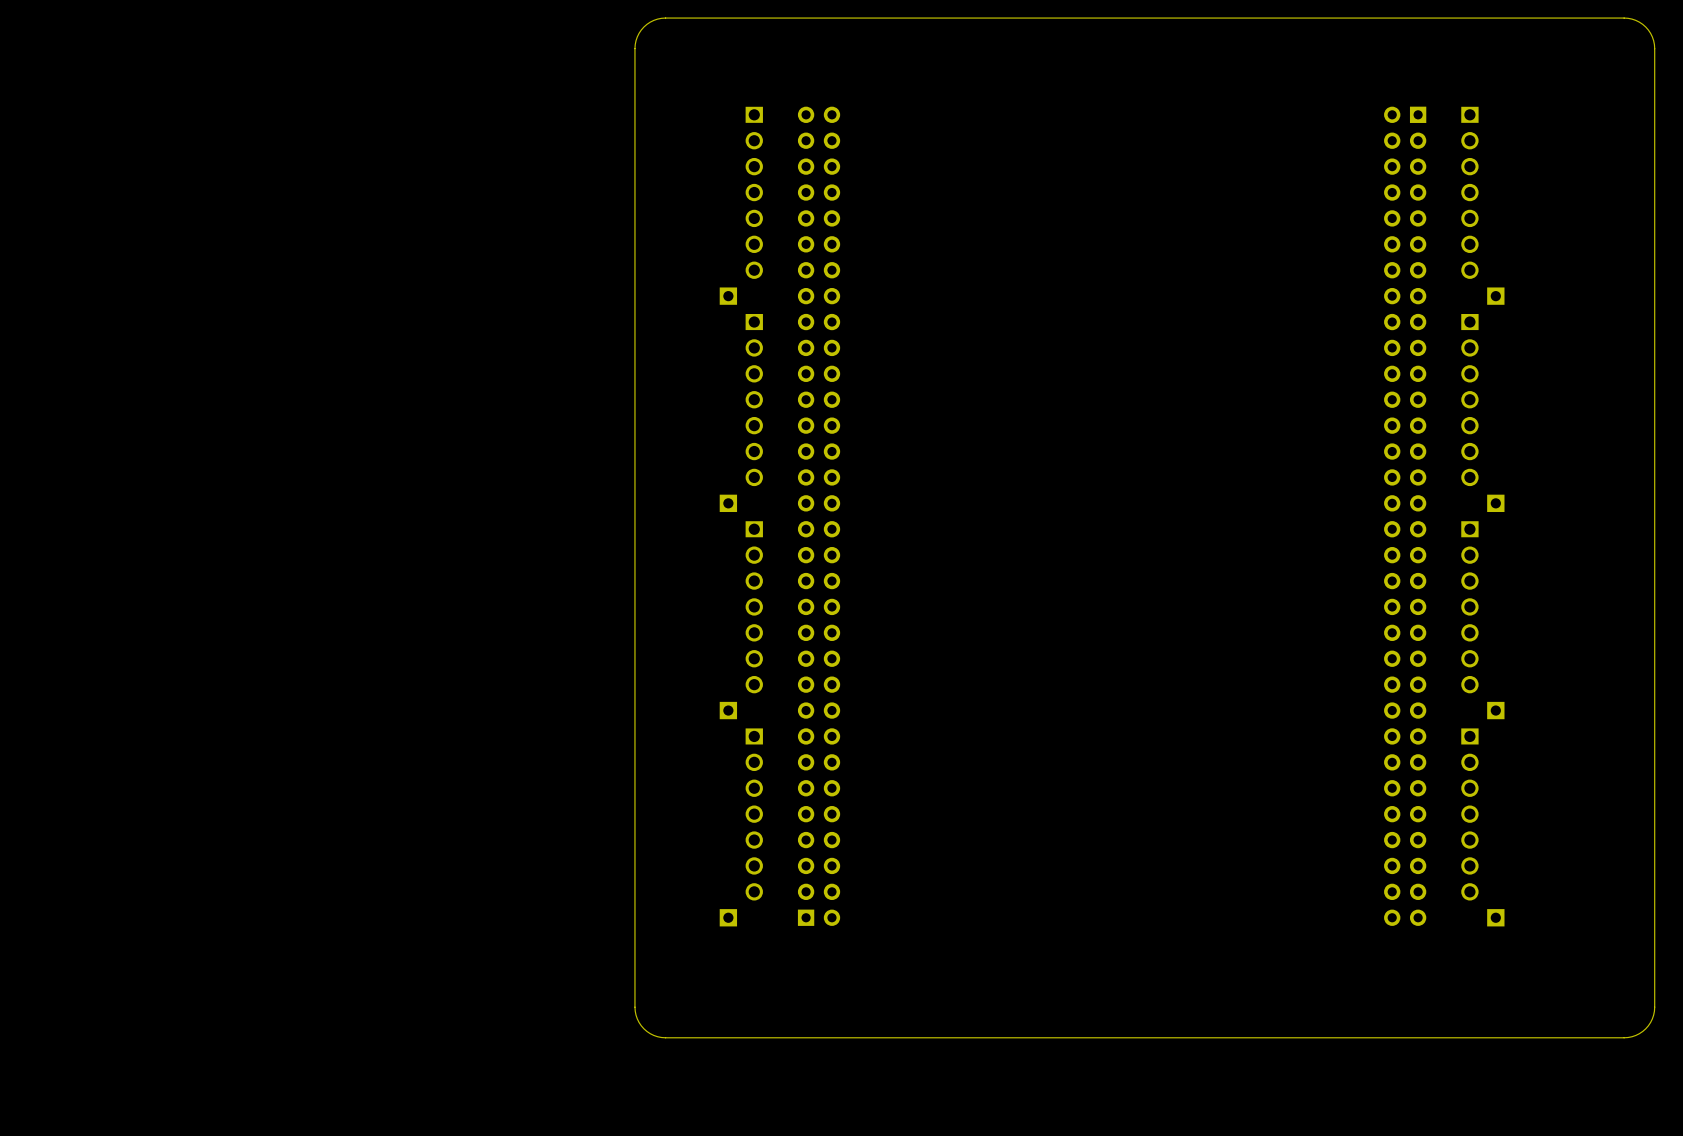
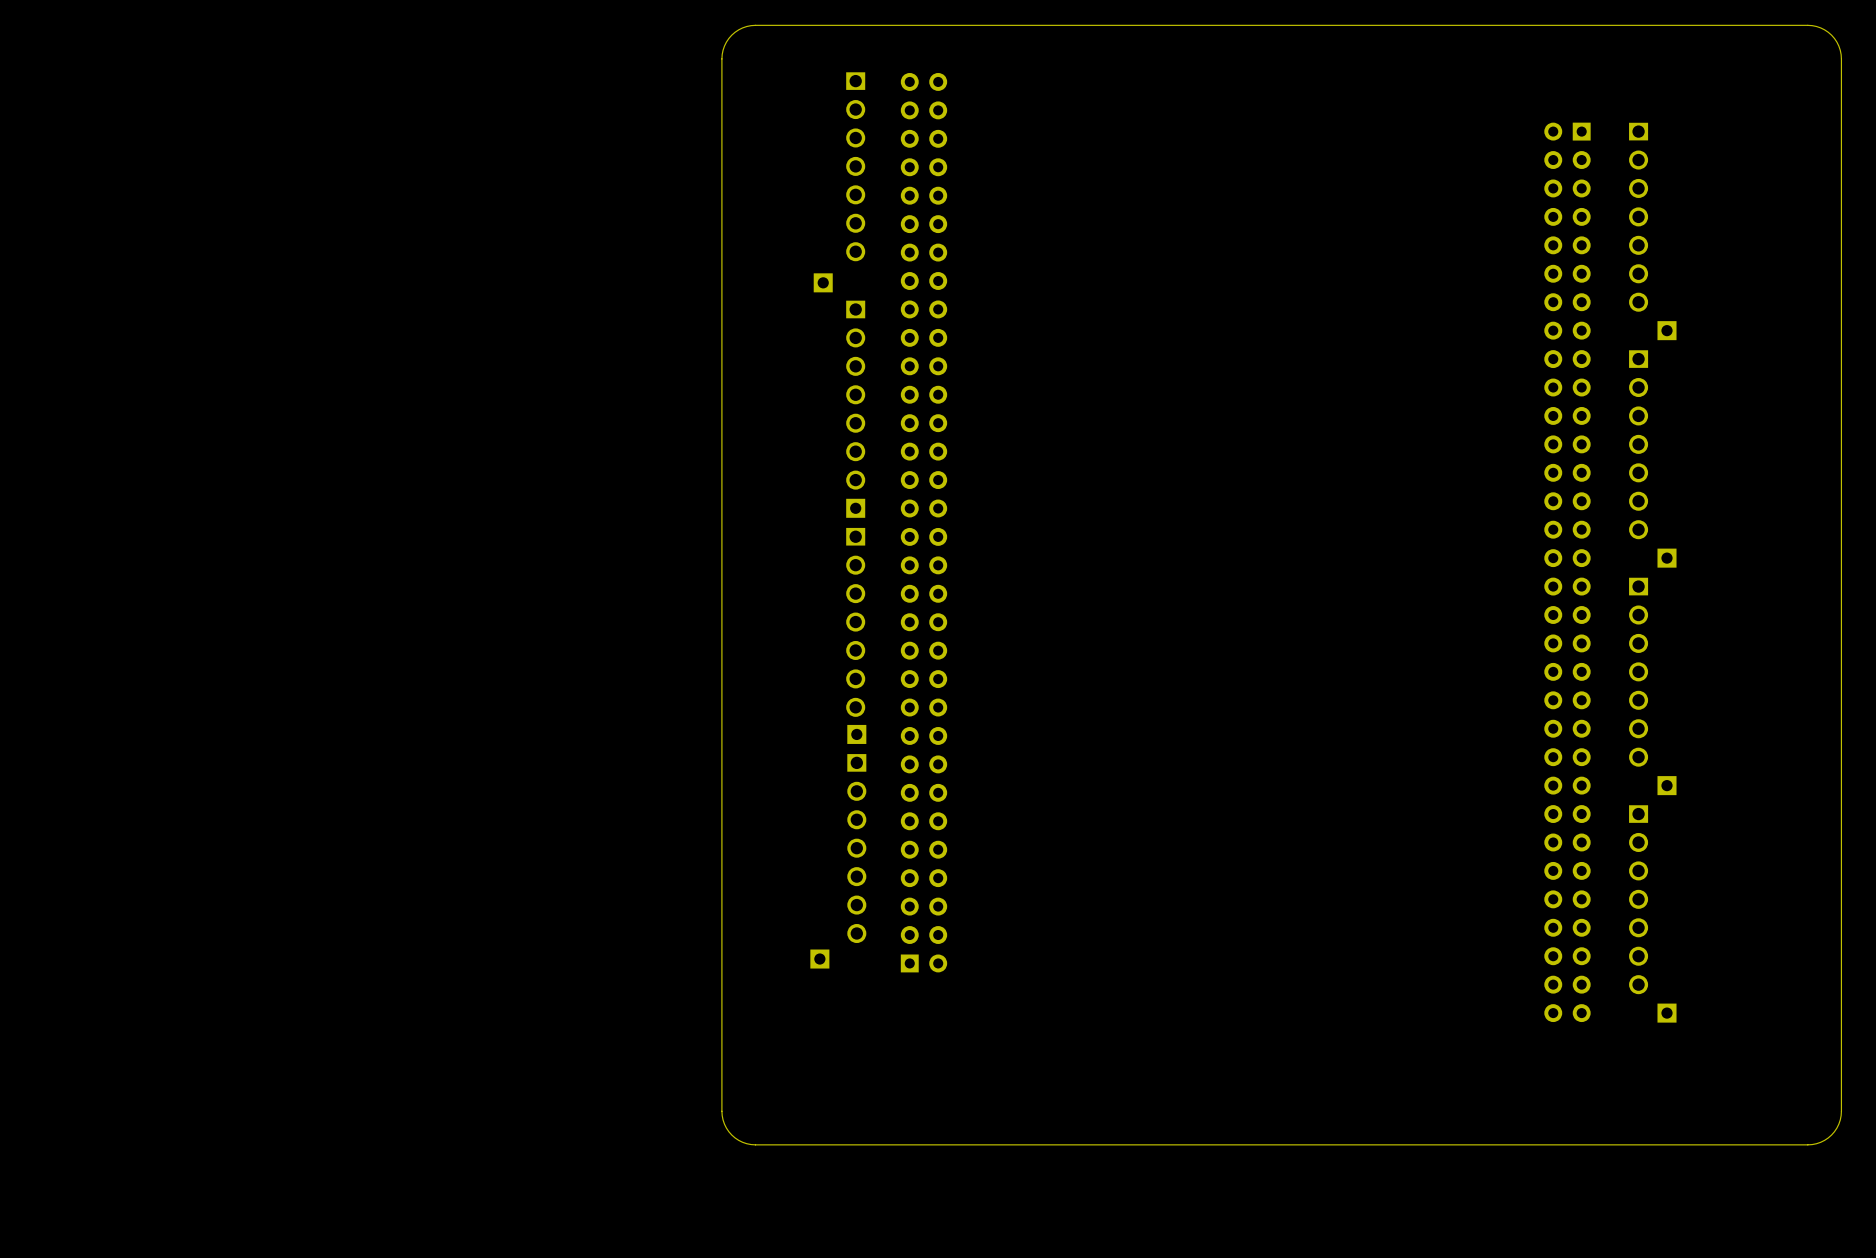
part position: (754, 192) -> (855, 166)
part position: (728, 296) -> (823, 282)
part position: (754, 400) -> (855, 395)
part position: (728, 503) -> (855, 508)
part position: (819, 516) -> (923, 522)
part position: (754, 607) -> (855, 622)
part position: (728, 710) -> (856, 734)
part position: (754, 814) -> (856, 848)
part position: (728, 917) -> (819, 959)

